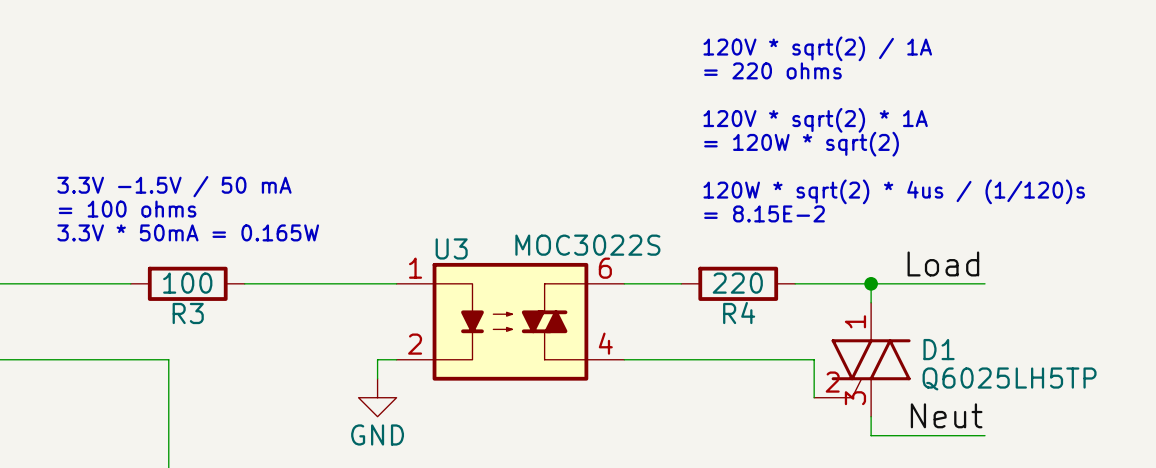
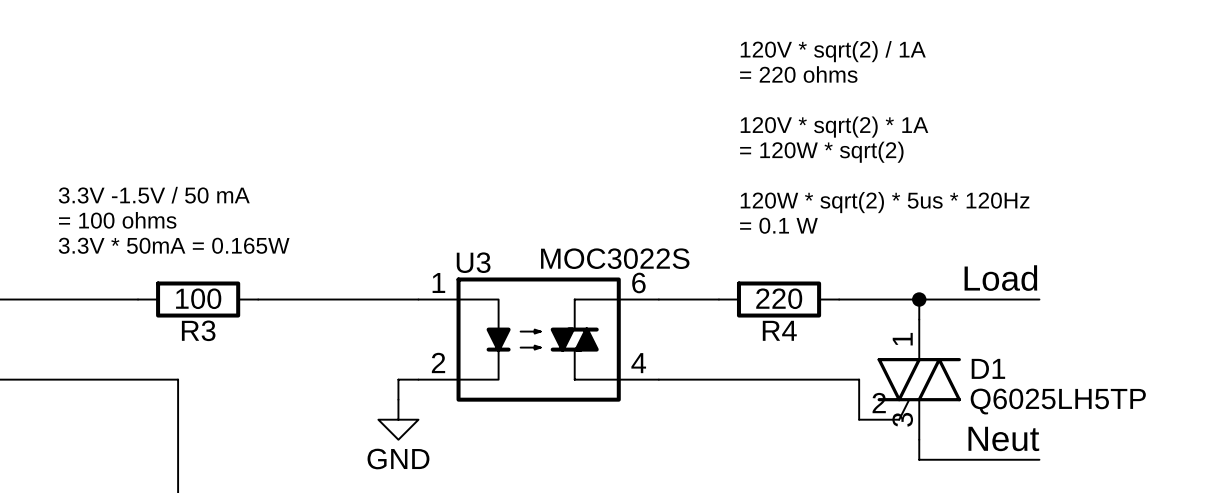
text: 120W * sqrt(2) * 4us / (1/120)s (894, 191) -> 120W * sqrt(2) * 5us * 120Hz (885, 202)
text: = 8.15E-2 (764, 213) -> = 0.1 W (778, 225)

